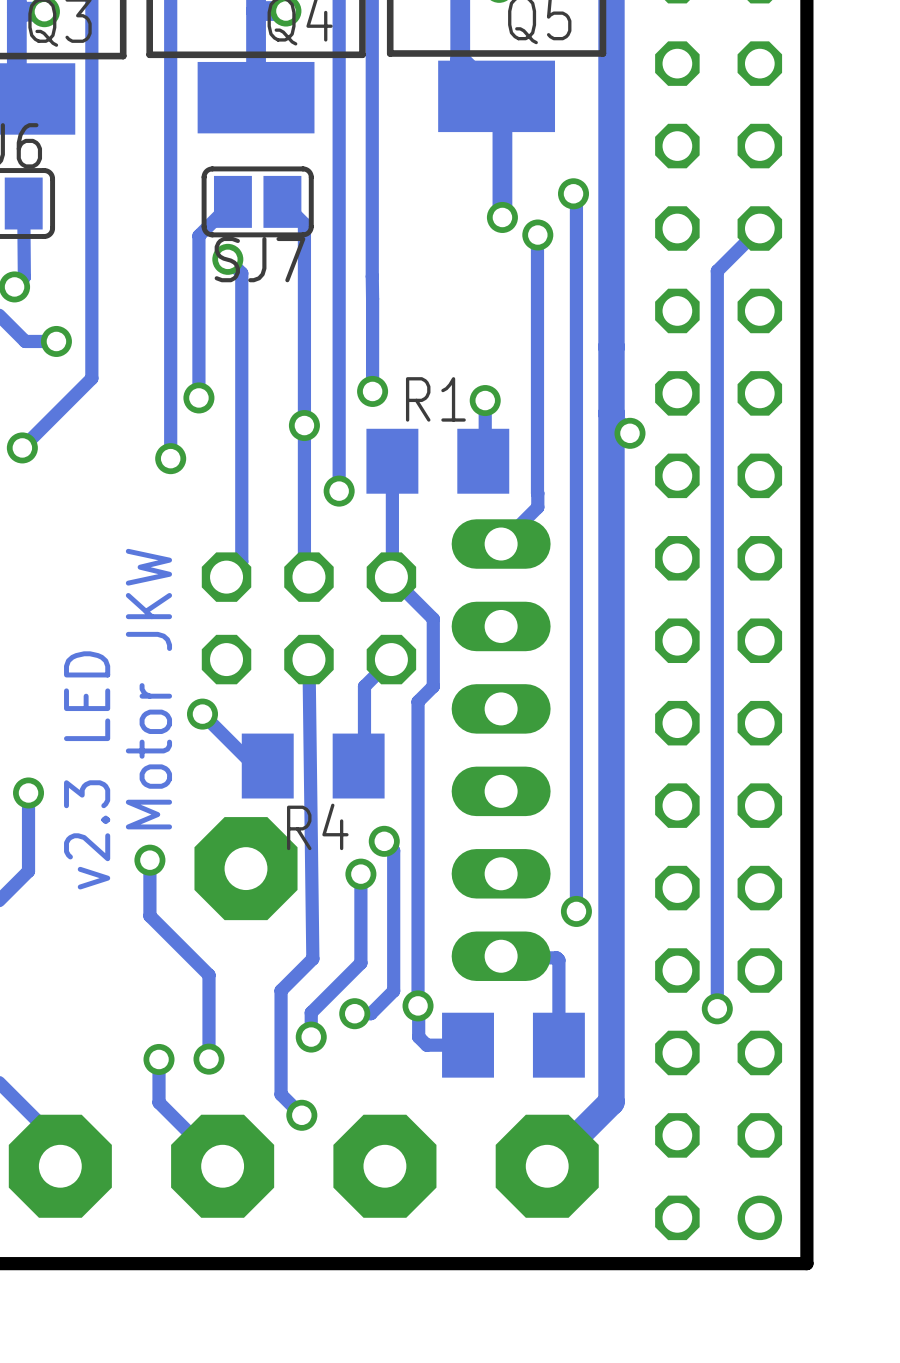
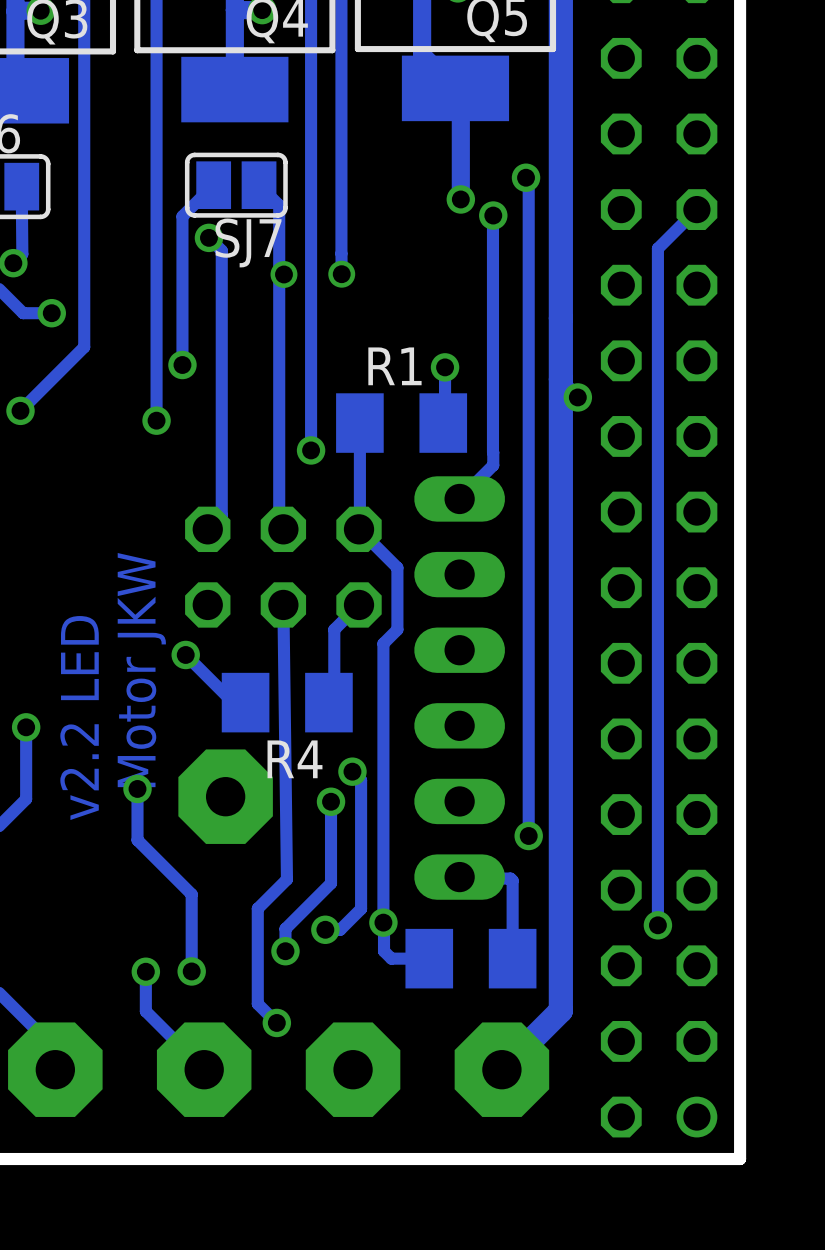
track: (372, 298) (372, 391) -> none
via: none -> (341, 274)
via: none -> (283, 274)
via: (372, 391) -> none
via: (304, 425) -> none
text: v2.3 LED (87, 770) -> v2.2 LED (79, 718)

